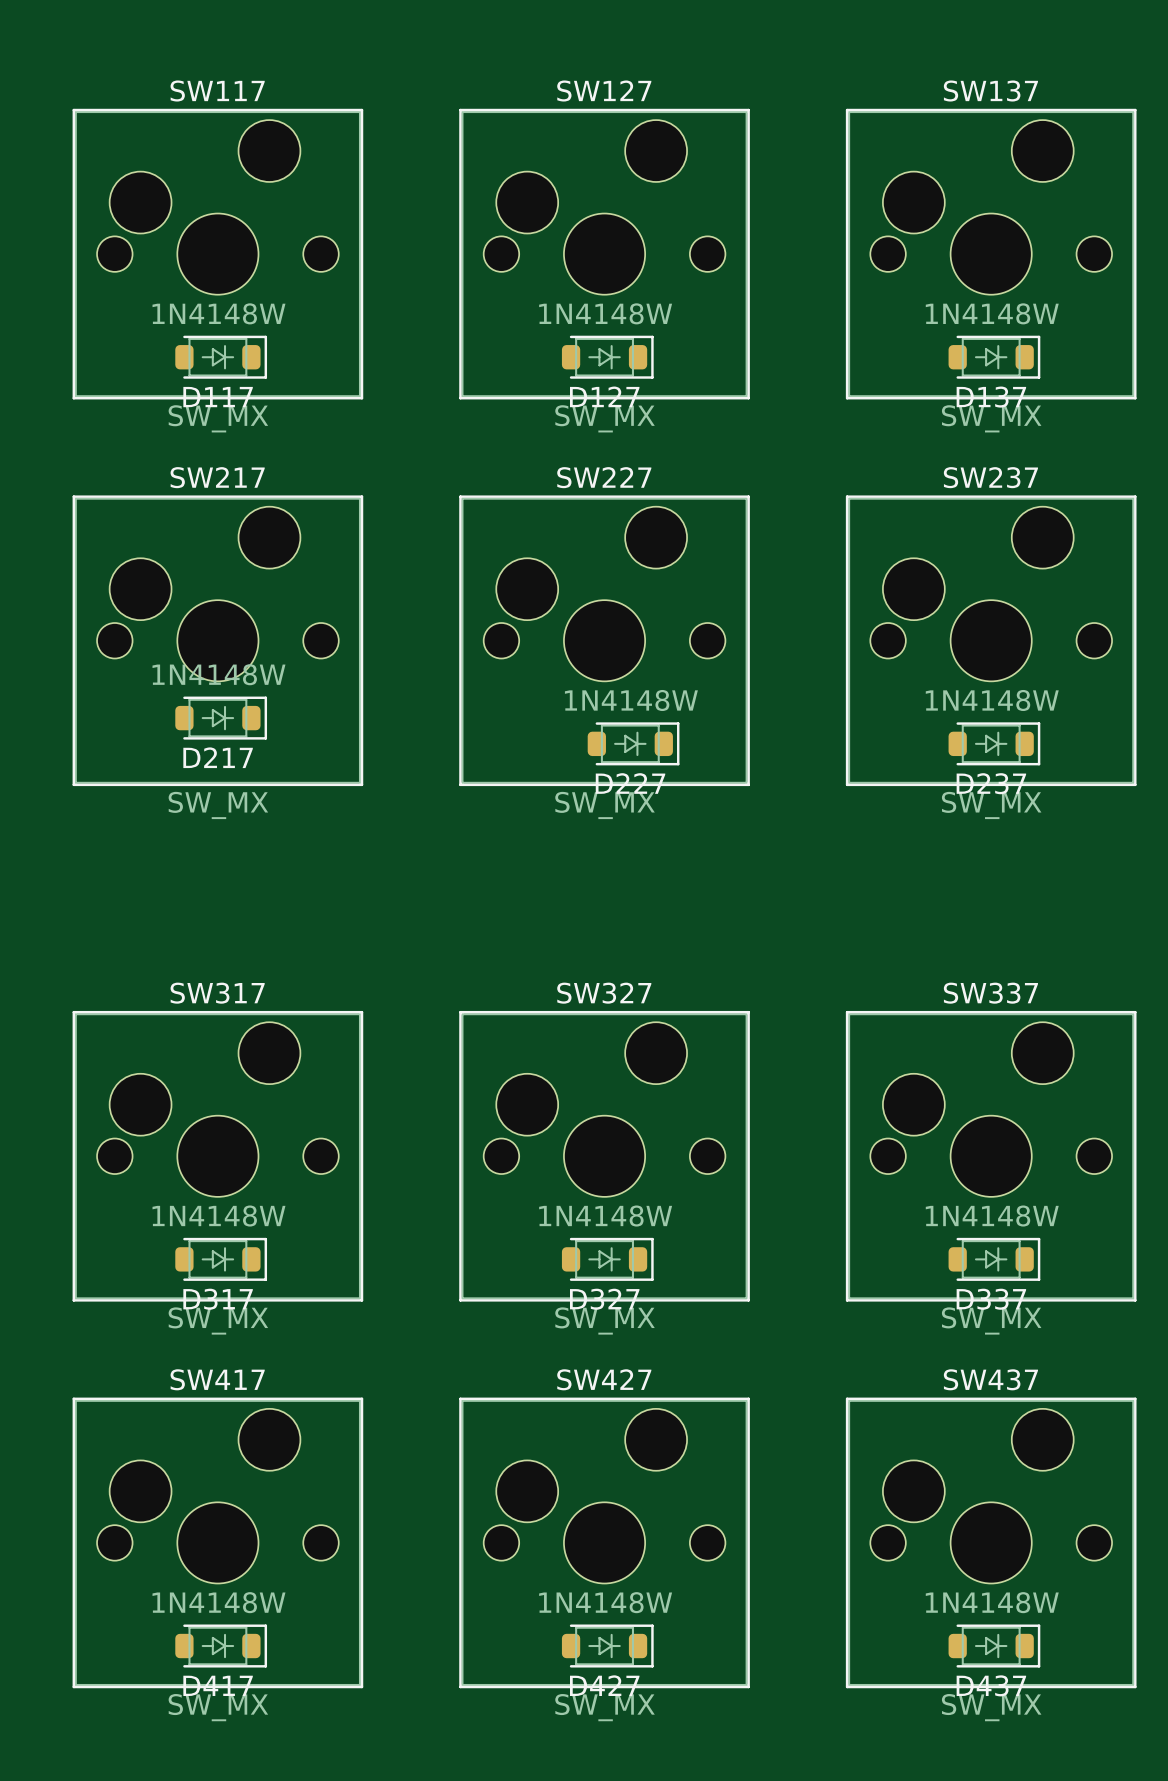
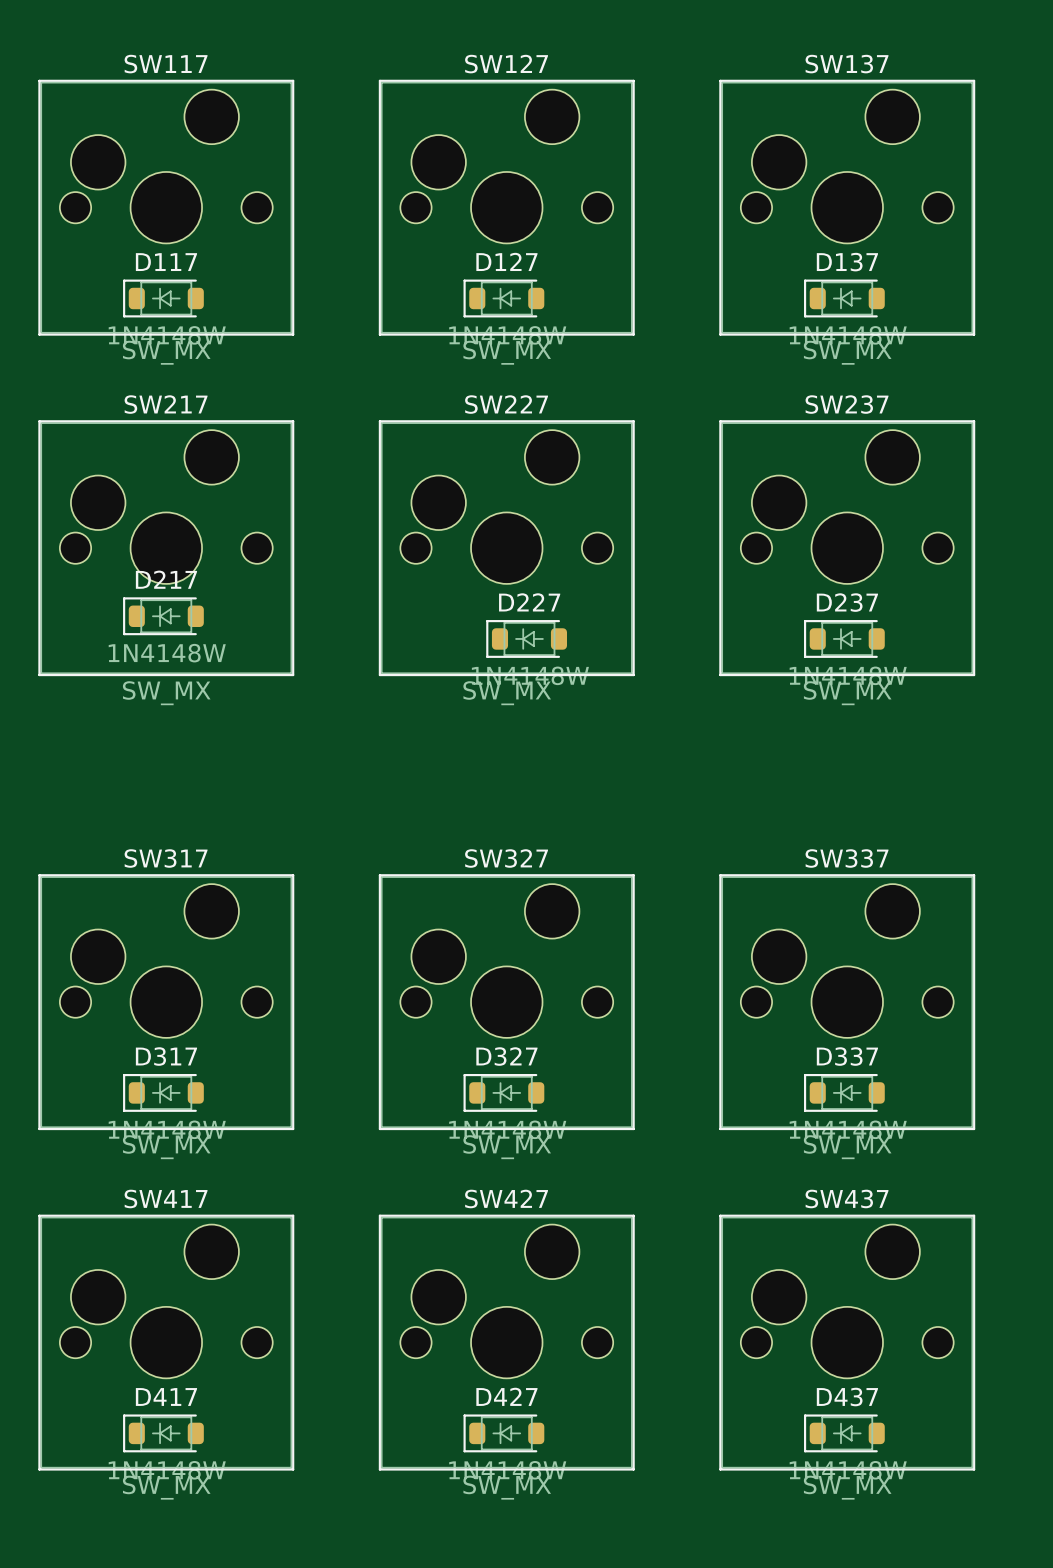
D117 rotation: 0° (221, 357) -> 180° (163, 298)
D127 rotation: 0° (607, 357) -> 180° (503, 298)
D137 rotation: 0° (994, 357) -> 180° (844, 298)
D217 rotation: 0° (221, 718) -> 180° (163, 616)
D227 rotation: 0° (633, 743) -> 180° (526, 638)
D237 rotation: 0° (994, 743) -> 180° (844, 638)
D317 rotation: 0° (221, 1259) -> 180° (163, 1092)
D327 rotation: 0° (607, 1259) -> 180° (503, 1092)
D337 rotation: 0° (994, 1259) -> 180° (844, 1092)
D417 rotation: 0° (221, 1646) -> 180° (163, 1433)
D427 rotation: 0° (607, 1646) -> 180° (503, 1433)
D437 rotation: 0° (994, 1646) -> 180° (844, 1433)

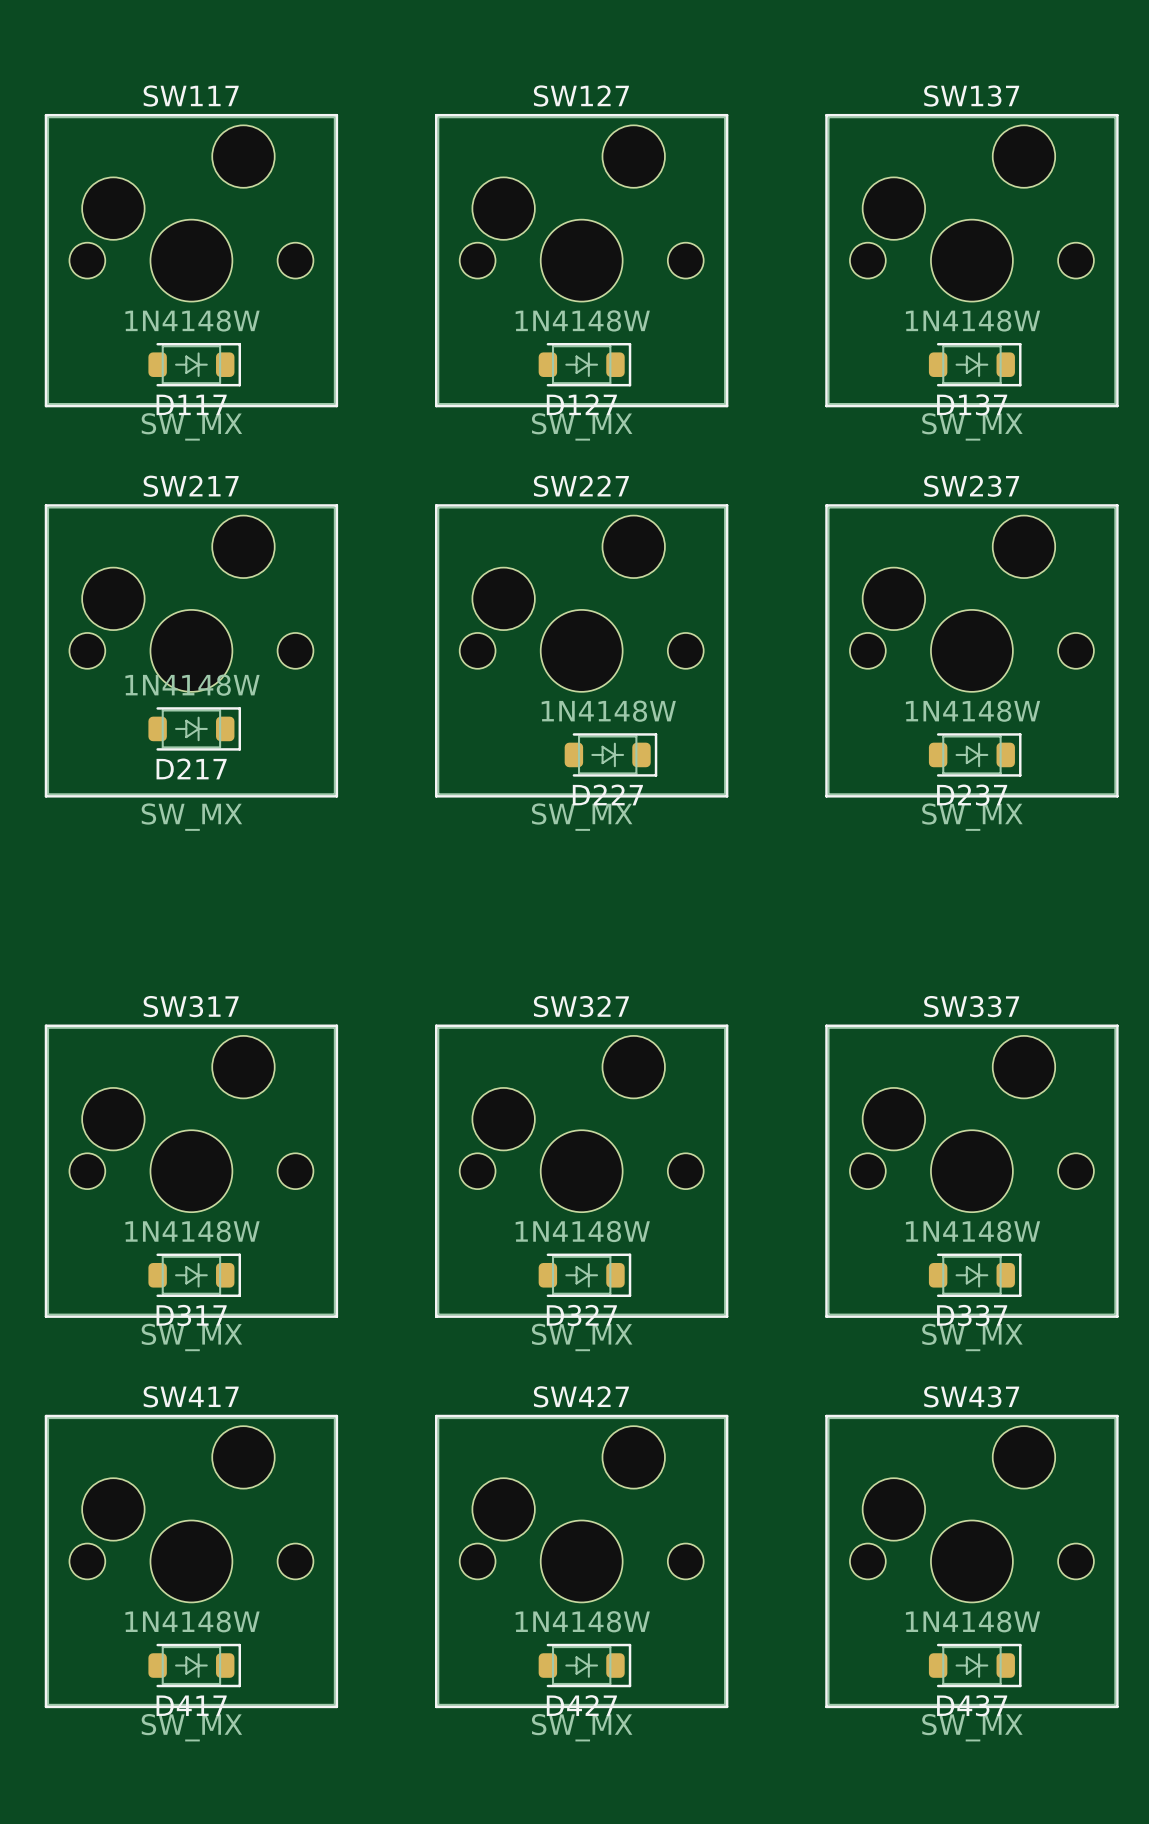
D117 rotation: 0° (163, 298) -> 180° (194, 364)
D127 rotation: 0° (503, 298) -> 180° (584, 364)
D137 rotation: 0° (844, 298) -> 180° (975, 364)
D217 rotation: 0° (163, 616) -> 180° (194, 728)
D227 rotation: 0° (526, 638) -> 180° (610, 754)
D237 rotation: 0° (844, 638) -> 180° (975, 754)
D317 rotation: 0° (163, 1092) -> 180° (194, 1275)
D327 rotation: 0° (503, 1092) -> 180° (584, 1275)
D337 rotation: 0° (844, 1092) -> 180° (975, 1275)
D417 rotation: 0° (163, 1433) -> 180° (194, 1665)
D427 rotation: 0° (503, 1433) -> 180° (584, 1665)
D437 rotation: 0° (844, 1433) -> 180° (975, 1665)

